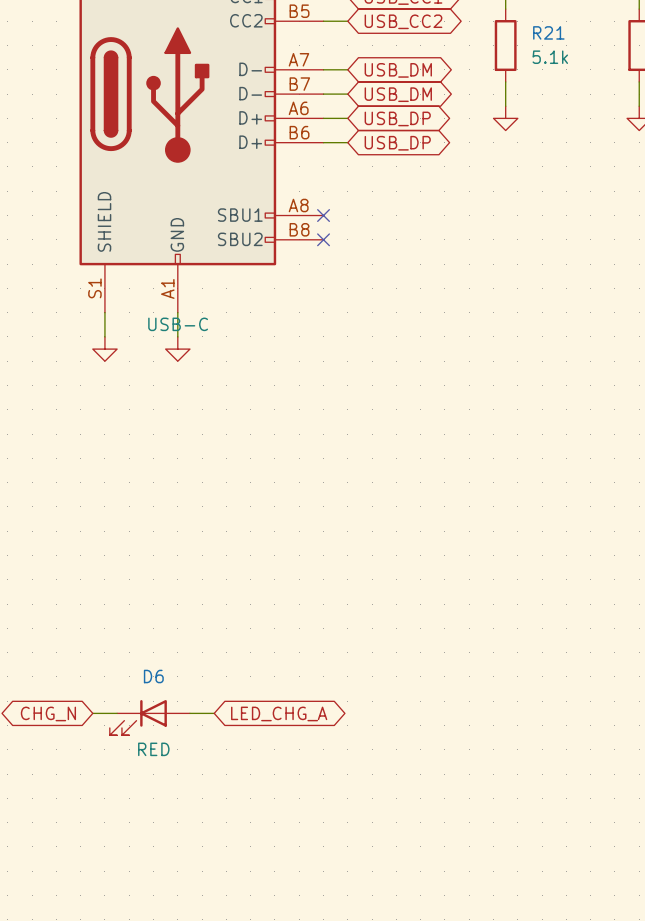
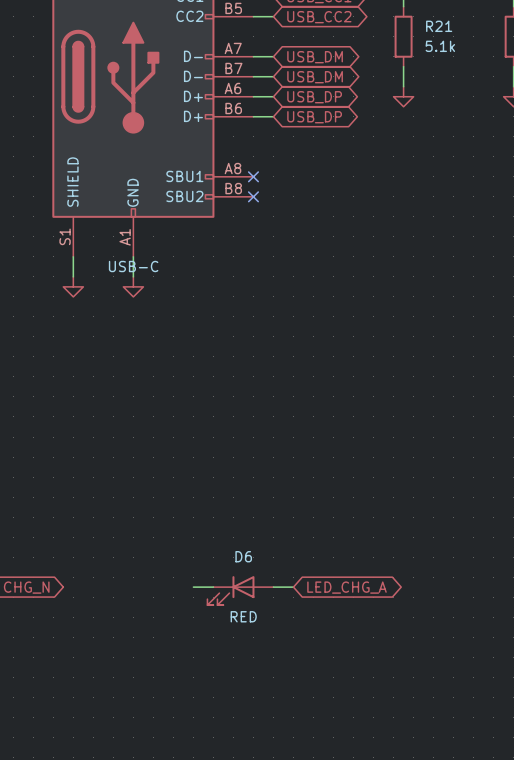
wire: (92, 713) (117, 713) -> (193, 587) (213, 587)
wire: (189, 713) (214, 713) -> (273, 587) (293, 587)
global label position: LED_CHG_A (279, 713) -> LED_CHG_A (347, 587)
D6 position: (149, 717) -> (240, 590)

